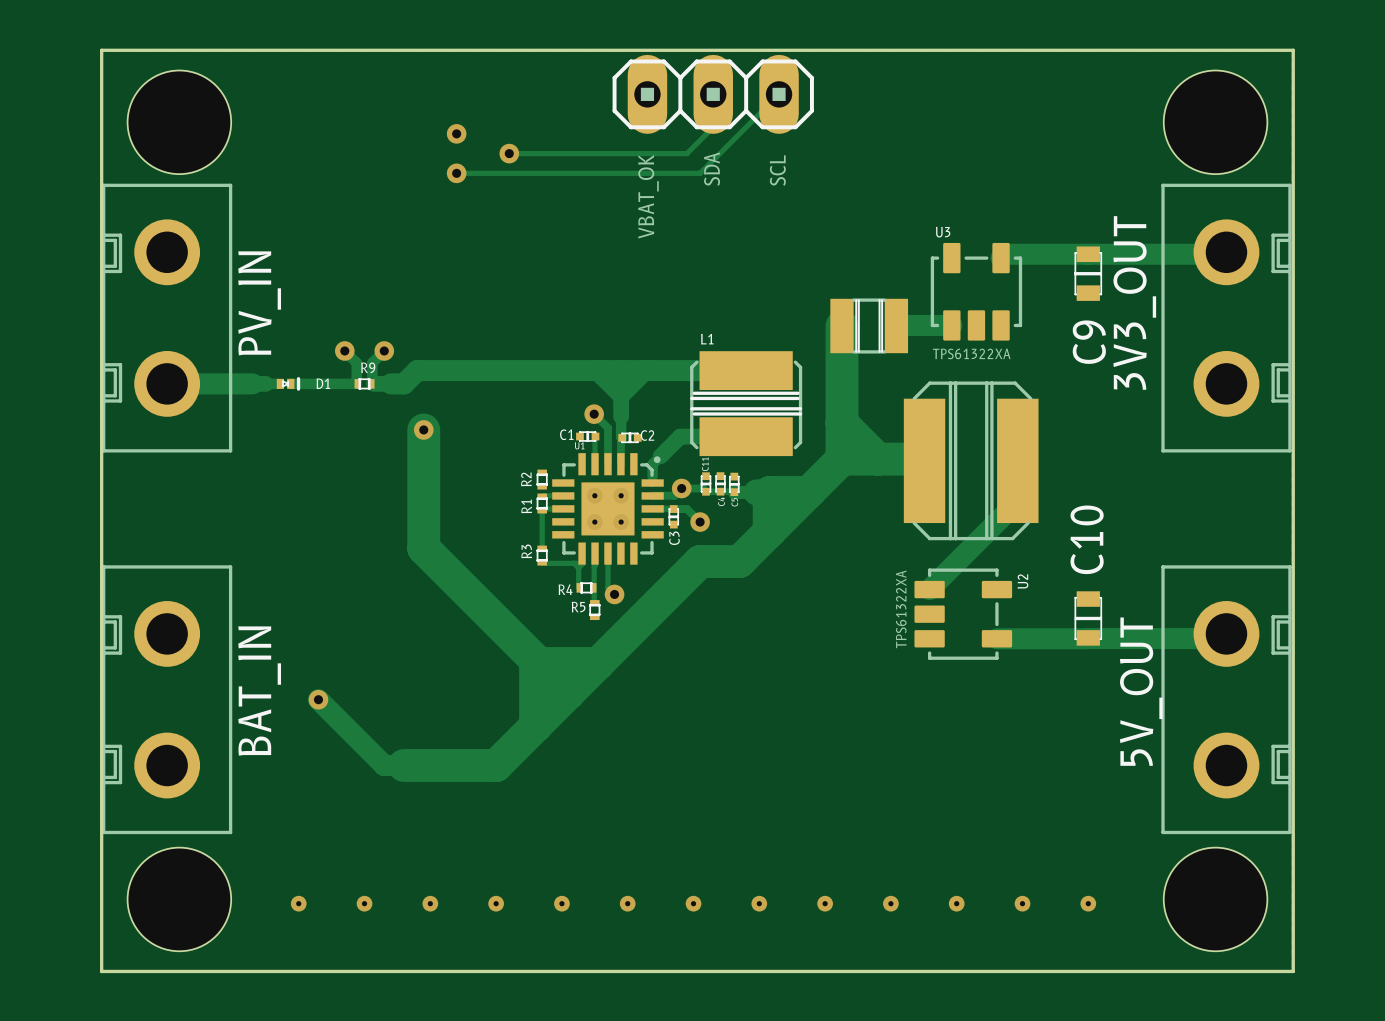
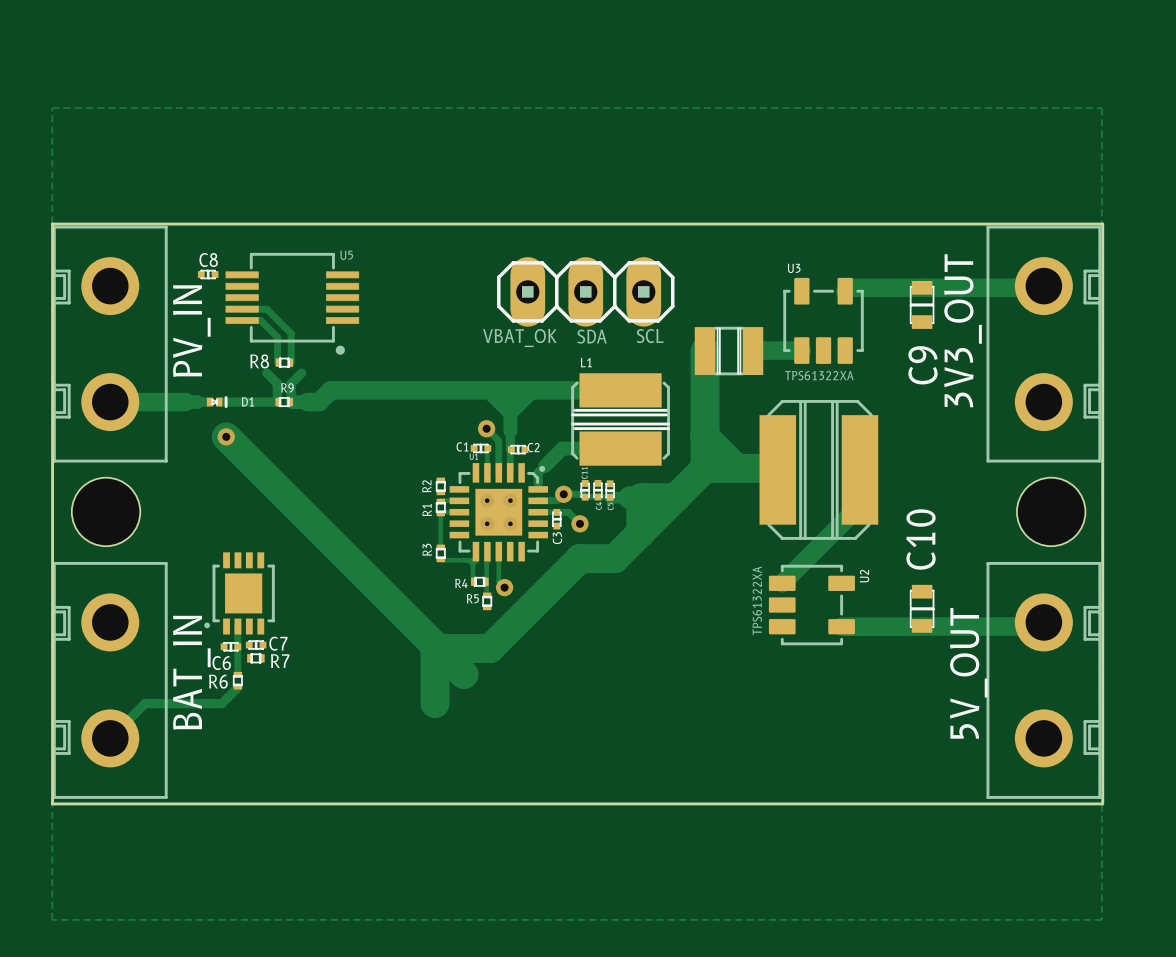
part footprint: [100, 48, 1295, 974] -> [51, 222, 1105, 806]
track: (713, 94) (713, 127) (686, 153) (509, 153) -> none
part position: (713, 94) -> (585, 291)
track: (779, 94) (700, 173) (456, 173) -> none
via: (456, 133) -> none
via: (509, 153) -> none
text rotation: 0° (712, 169) -> 90° clockwise (592, 336)
text position: SDA (712, 169) -> SDA (592, 336)
text rotation: 0° (777, 170) -> 90° clockwise (650, 336)
text position: SCL (777, 170) -> SCL (650, 336)
via: (456, 173) -> none
text rotation: 0° (648, 196) -> 90° clockwise (519, 338)
text position: VBAT_OK (648, 196) -> VBAT_OK (519, 338)
C8: none -> (208, 274)
U5: none -> (292, 303)
track: none -> (242, 309) (266, 309) (291, 333) (291, 362)
track: none -> (242, 320) (260, 320) (277, 337) (277, 362)
R8: none -> (284, 362)
via: (344, 350) -> none
via: (384, 350) -> none
via: none -> (226, 436)
track: (423, 429) (423, 548) -> (226, 436) (336, 547)
via: (423, 429) -> none
part: none -> (239, 593)
track: none -> (237, 626) (237, 673)
C7: none -> (256, 645)
C6: none -> (230, 646)
track: (598, 663) (496, 765) (384, 765) (318, 699) -> none
R7: none -> (255, 658)
via: (318, 699) -> none
R6: none -> (237, 680)
track: none -> (237, 687) (221, 703) (145, 703) (110, 738)
via: (298, 903) -> none
via: (364, 903) -> none
via: (430, 903) -> none
via: (496, 903) -> none
via: (561, 903) -> none
via: (627, 903) -> none
via: (693, 903) -> none
via: (759, 903) -> none
via: (825, 903) -> none
via: (890, 903) -> none
via: (956, 903) -> none
via: (1022, 903) -> none
via: (1088, 903) -> none

